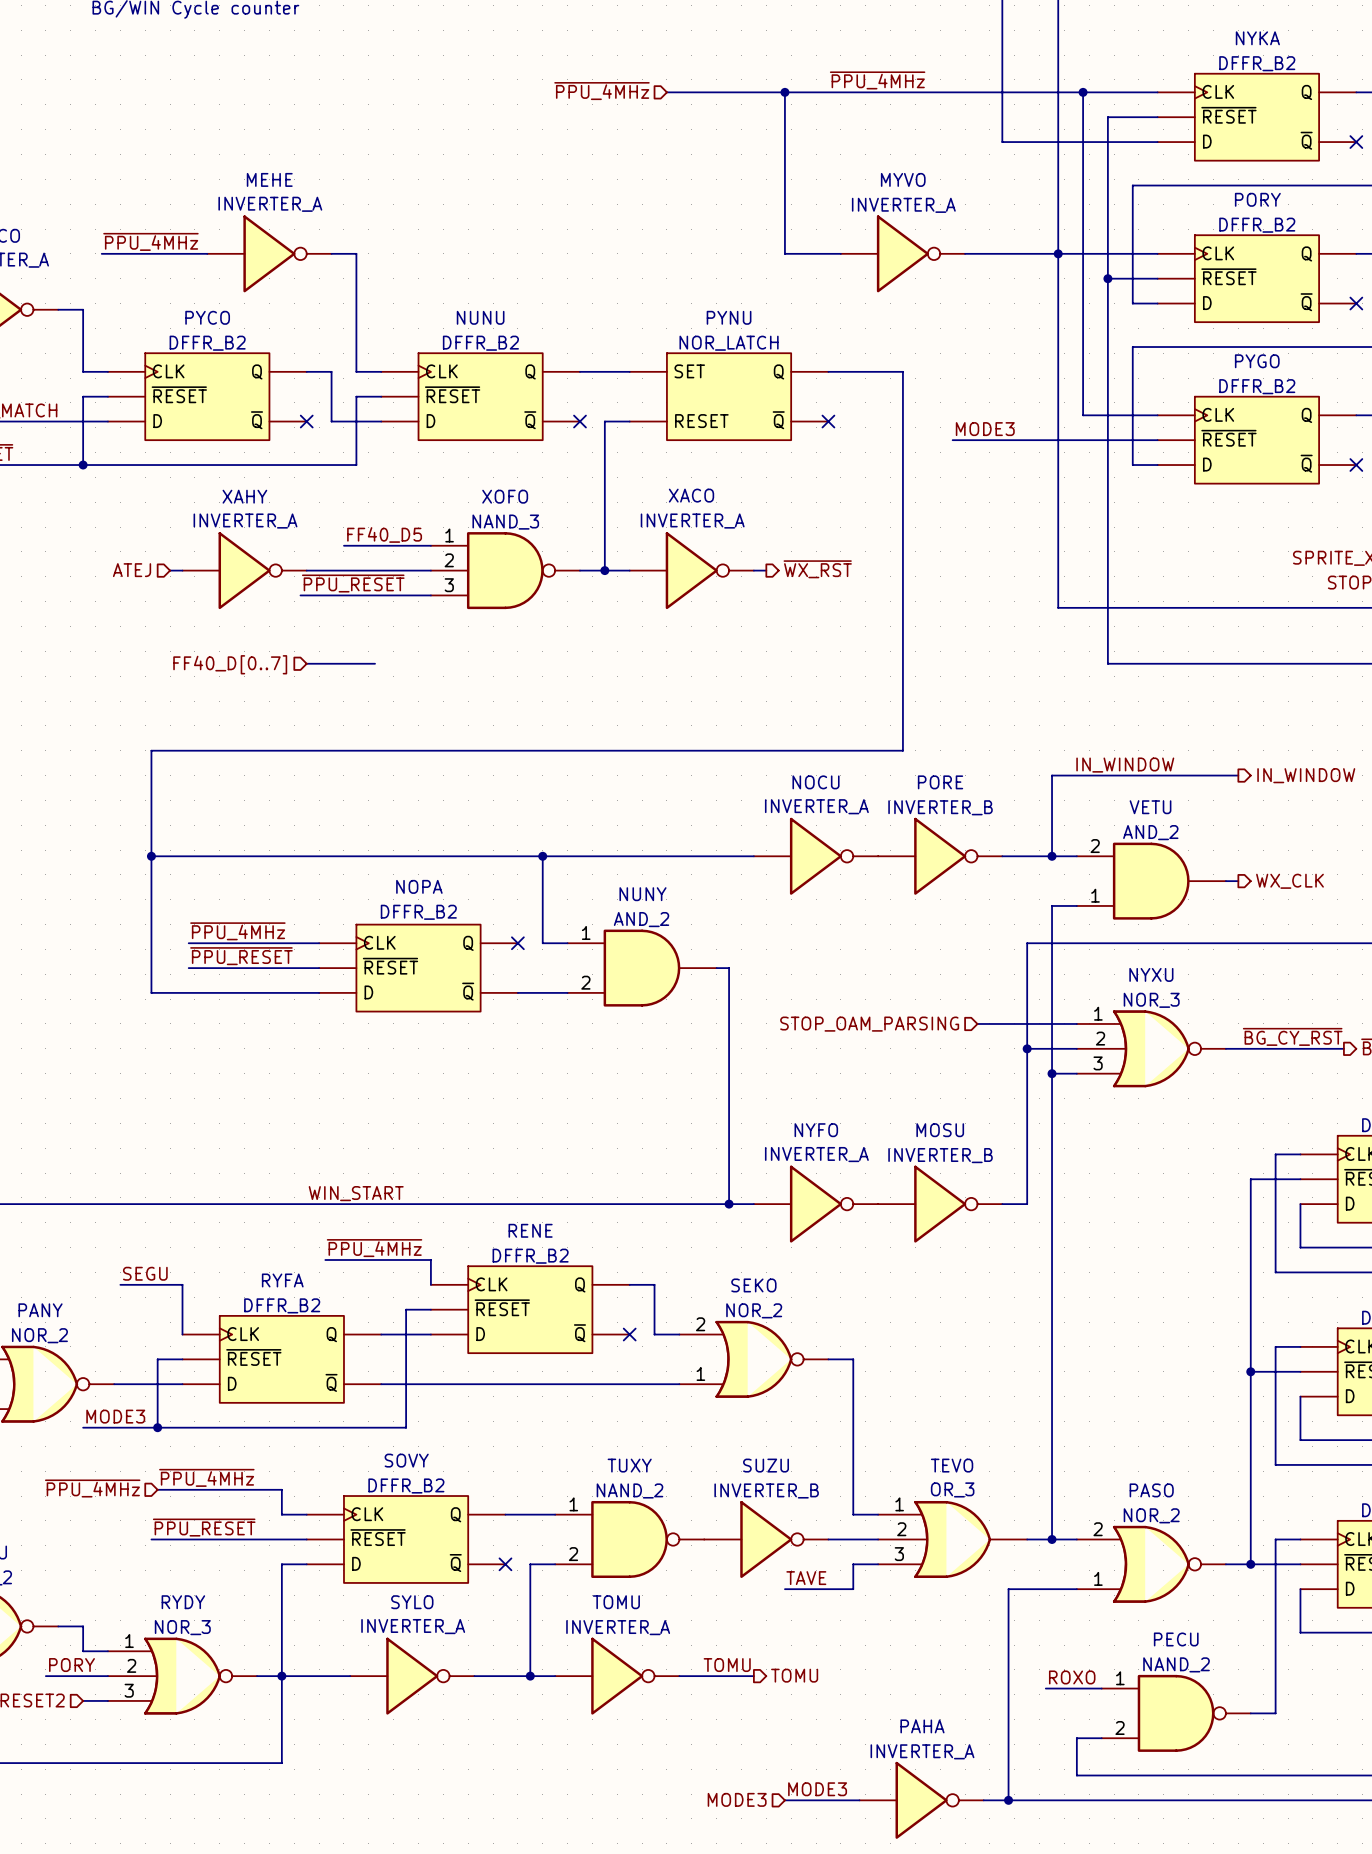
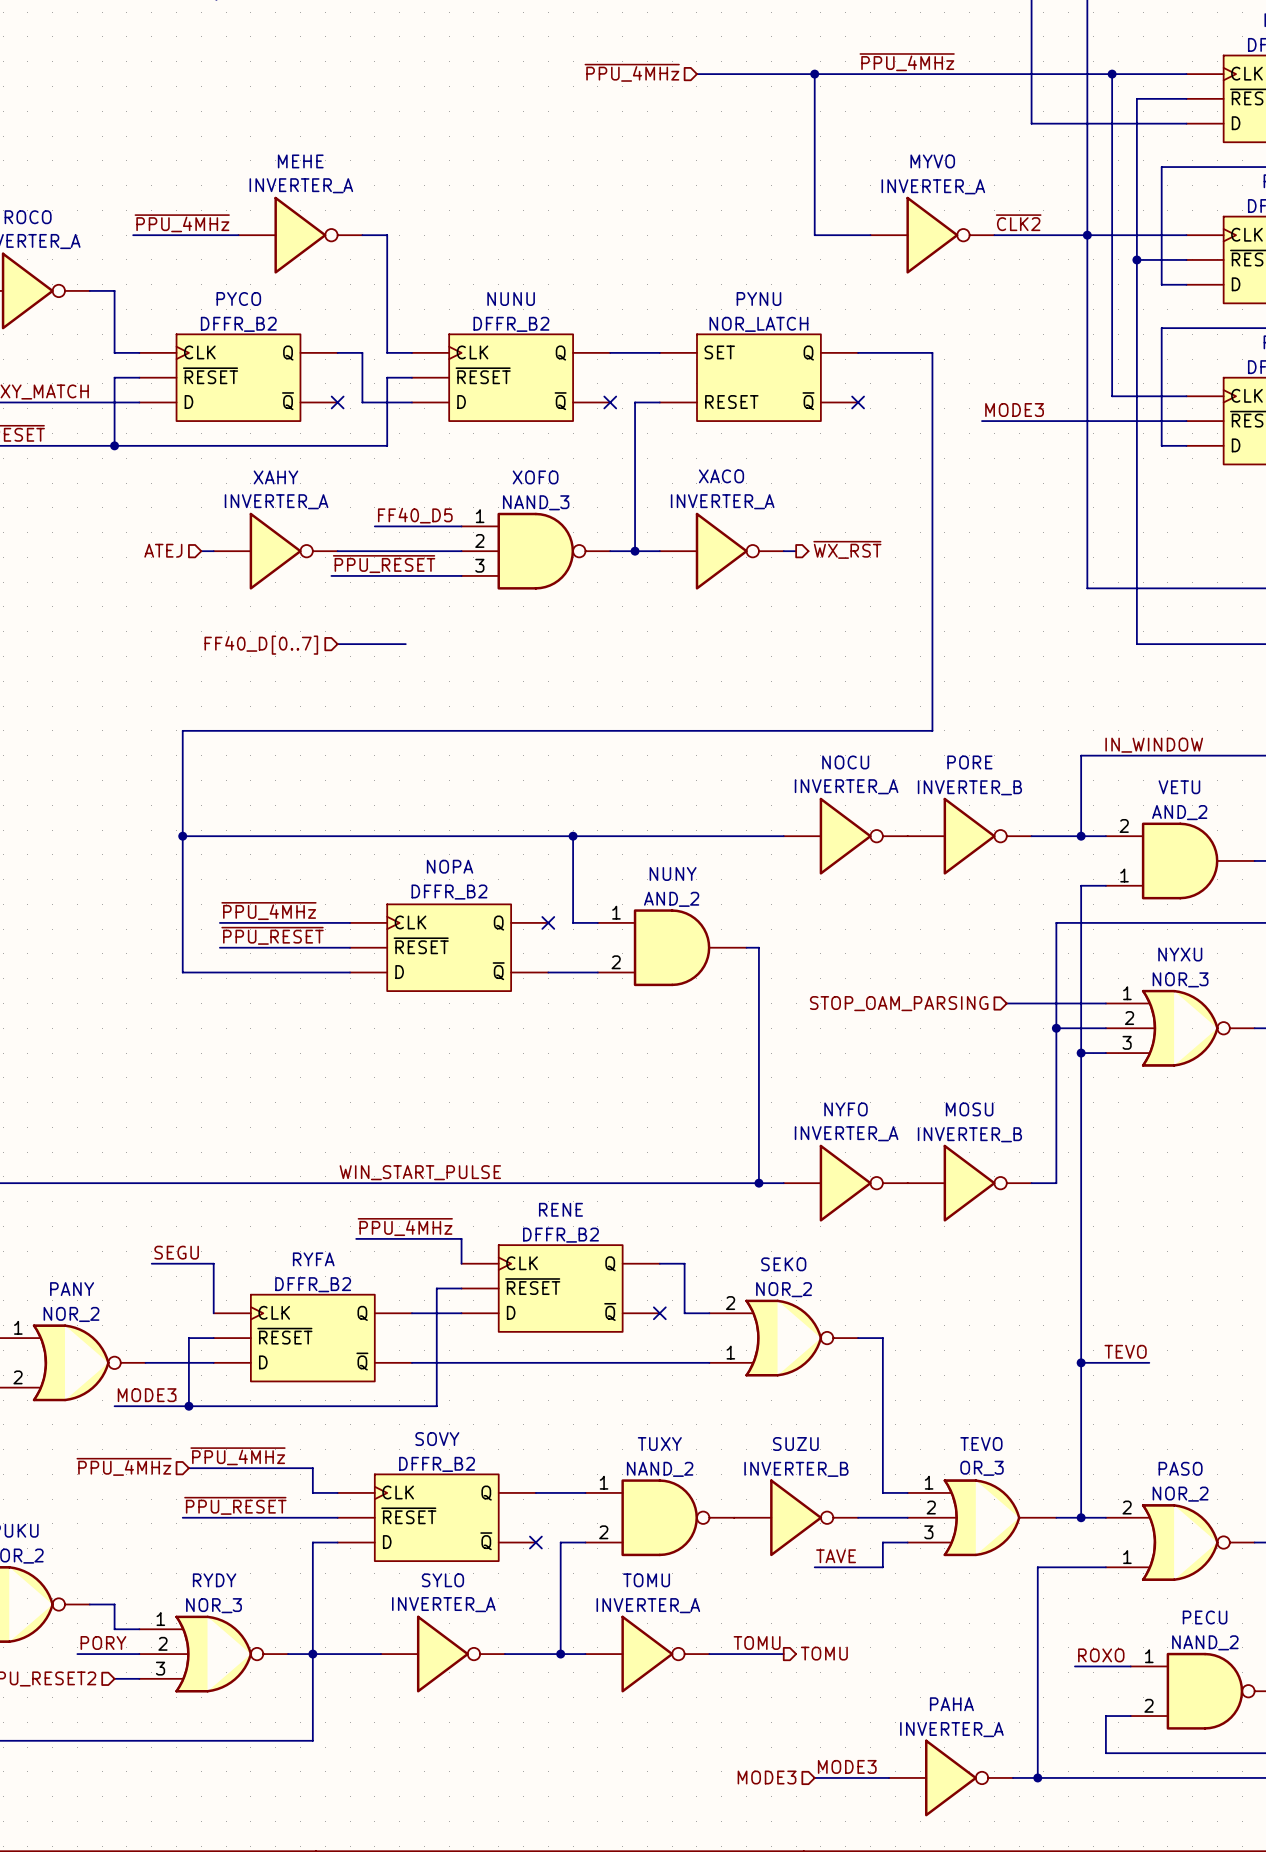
label: none -> ~{CLK2} (1018, 222)
label: WIN_START (356, 1193) -> WIN_START_PULSE (420, 1172)
label: none -> TEVO (1125, 1351)
wire: none -> (1081, 1362) (1149, 1362)
junction: none -> (1081, 1362)

